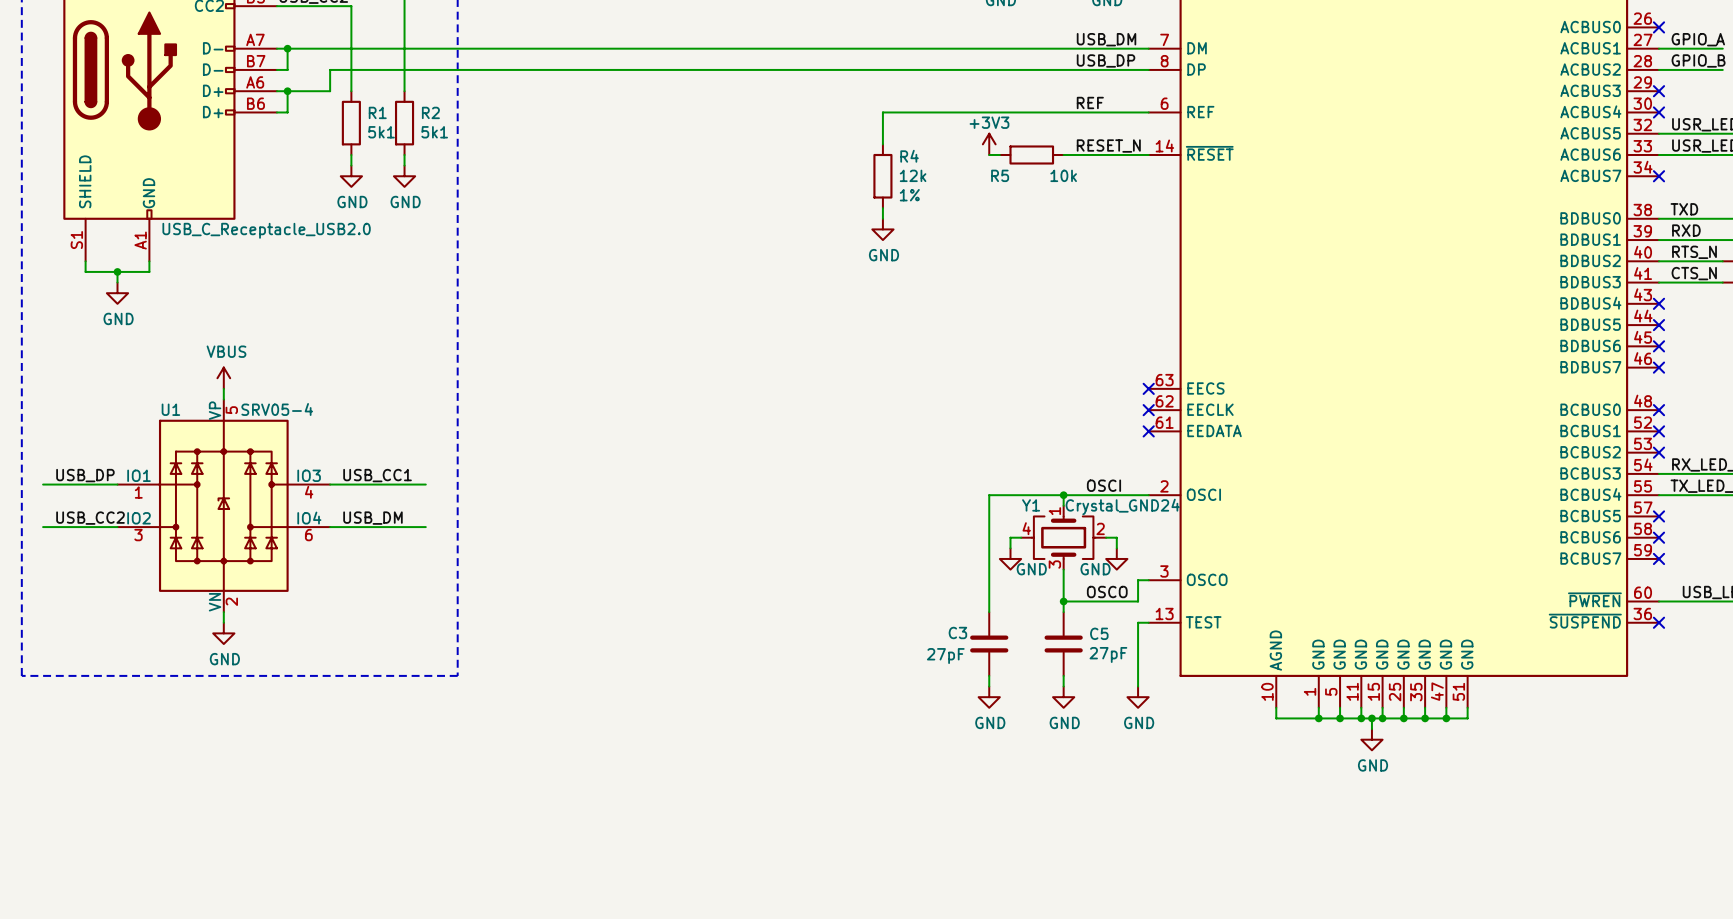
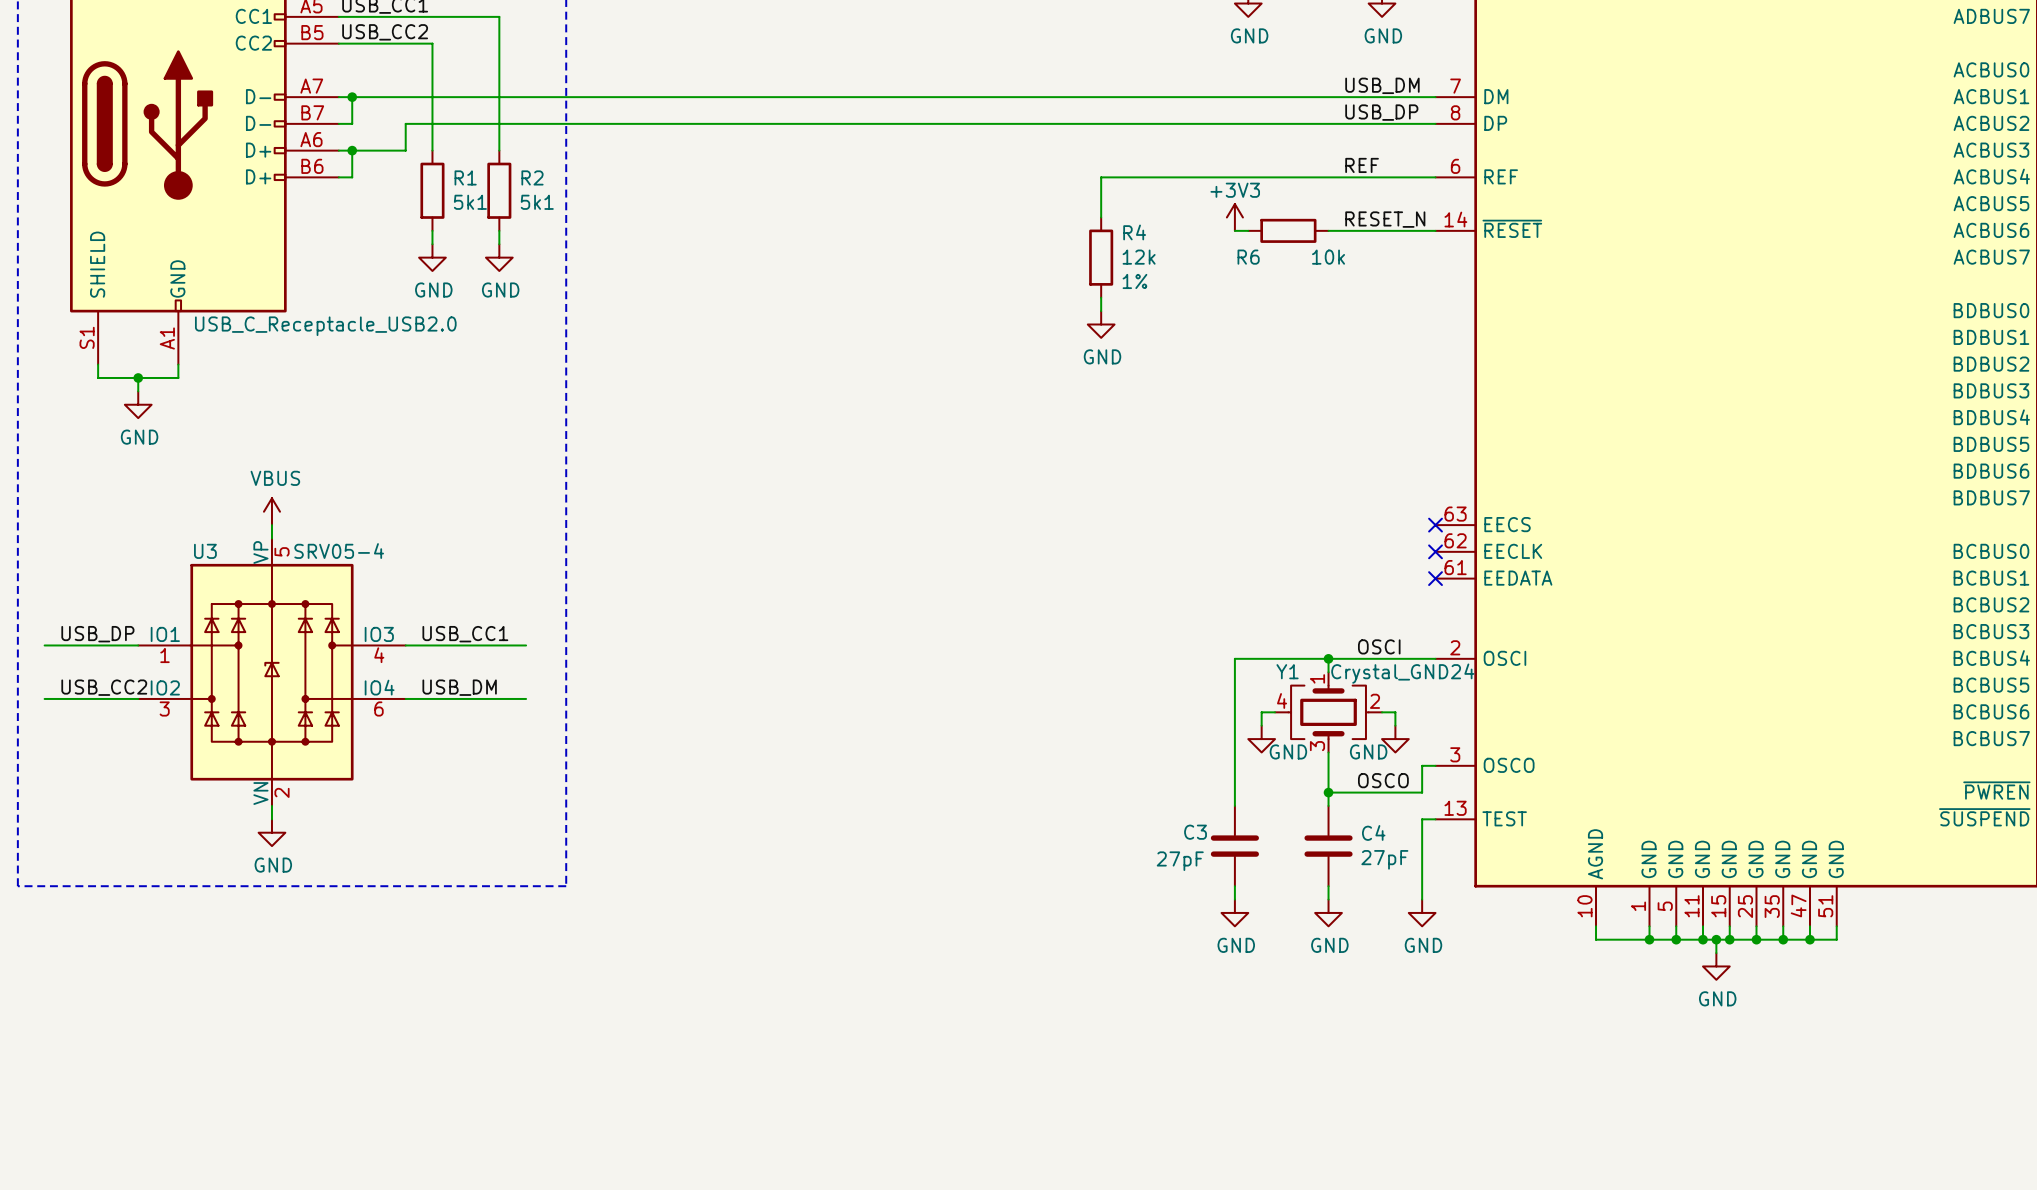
R5 name: R5 (1000, 175) -> R6 (1248, 257)
U1 name: U1 (170, 409) -> U3 (205, 551)
C5 name: C5 (1099, 633) -> C4 (1373, 832)

